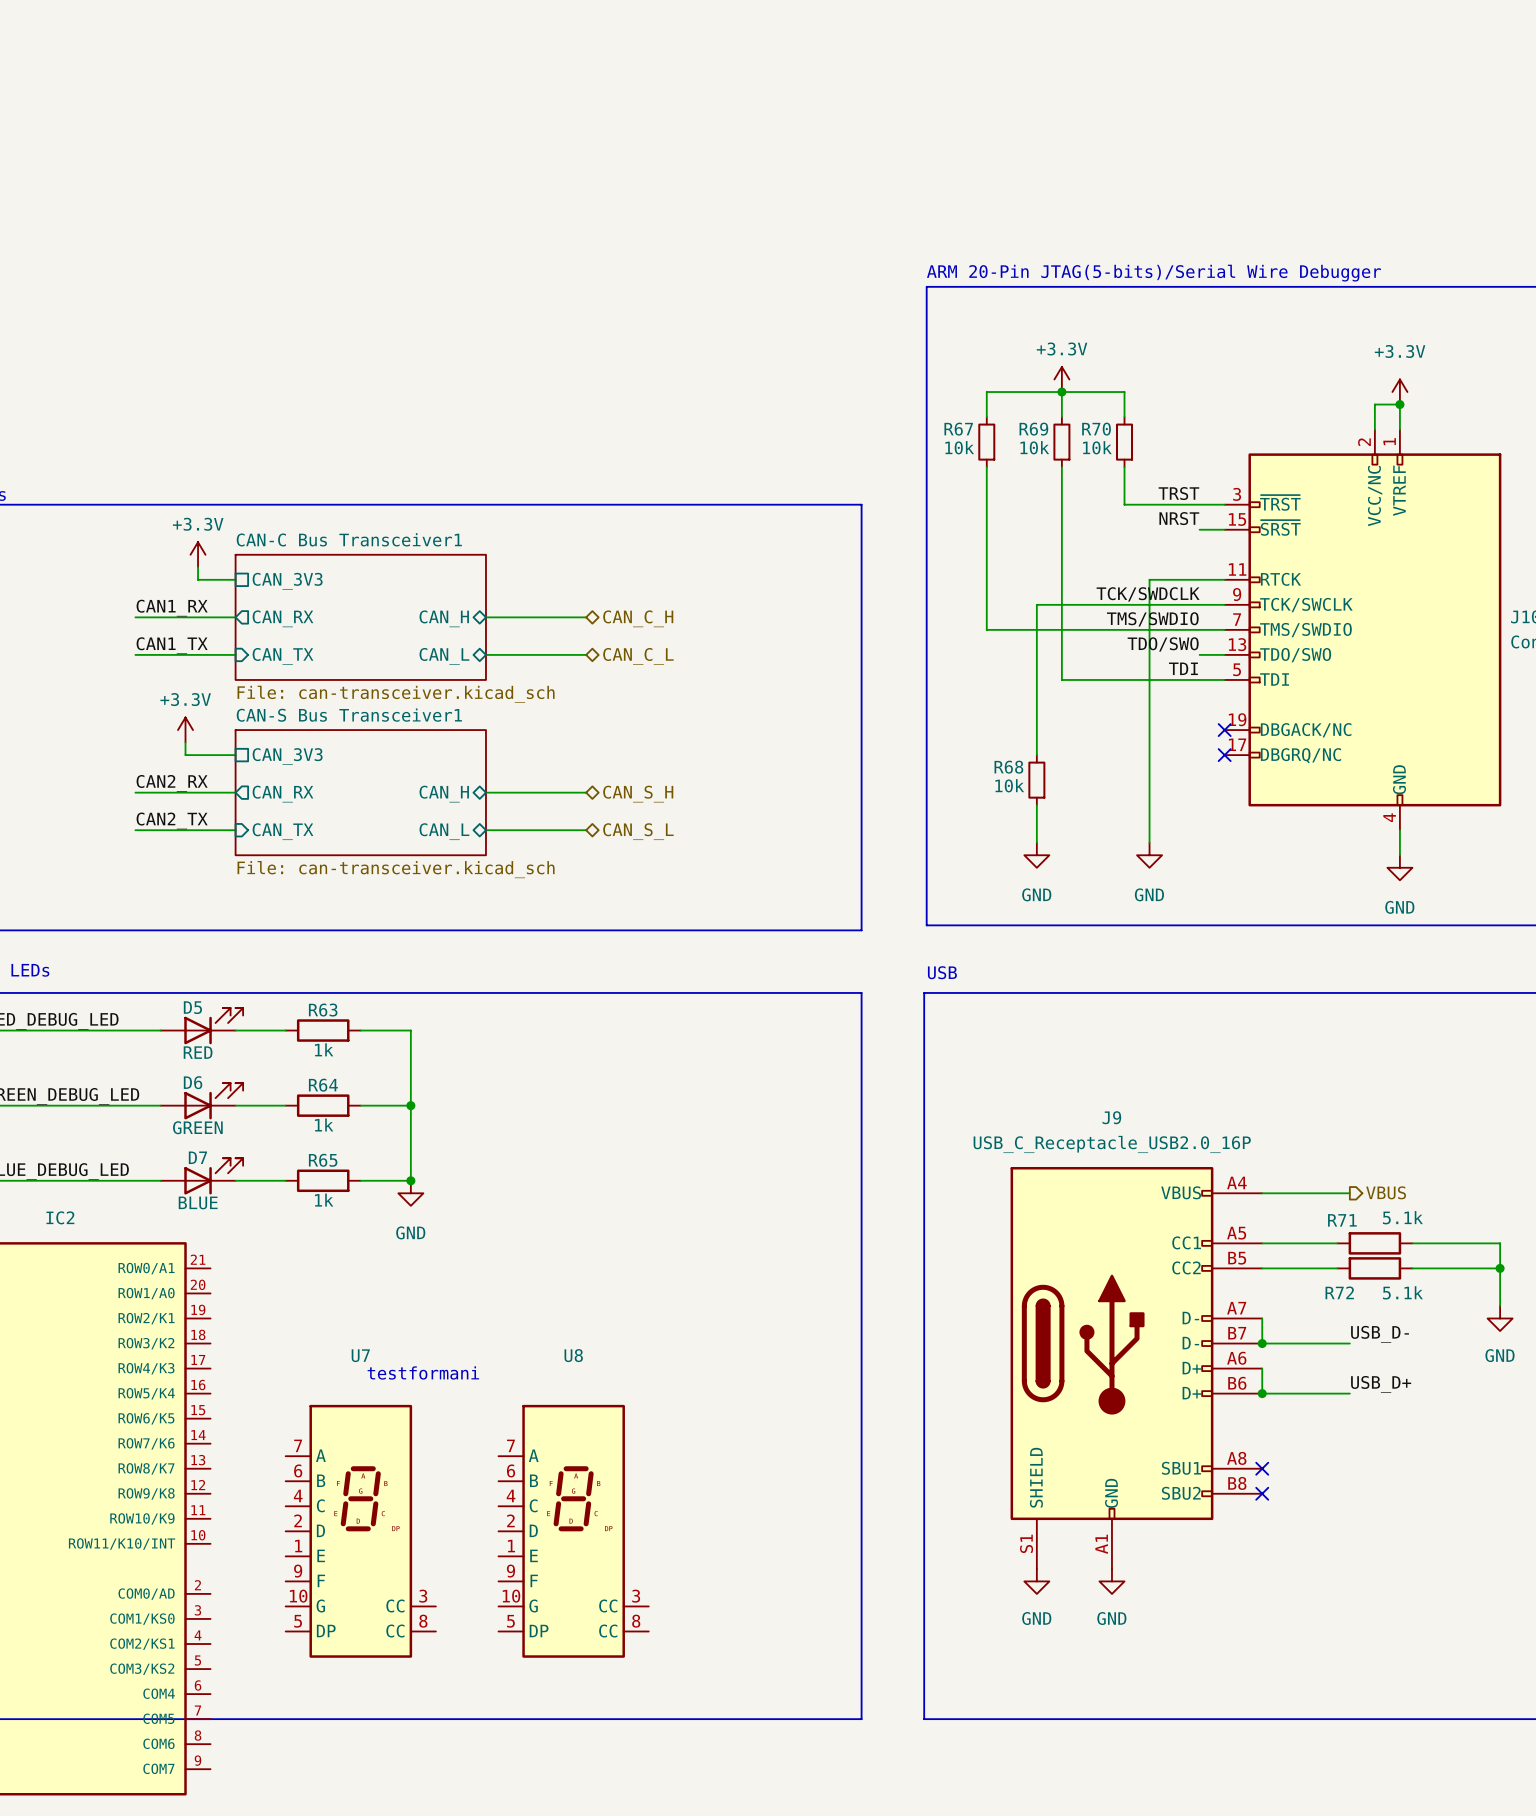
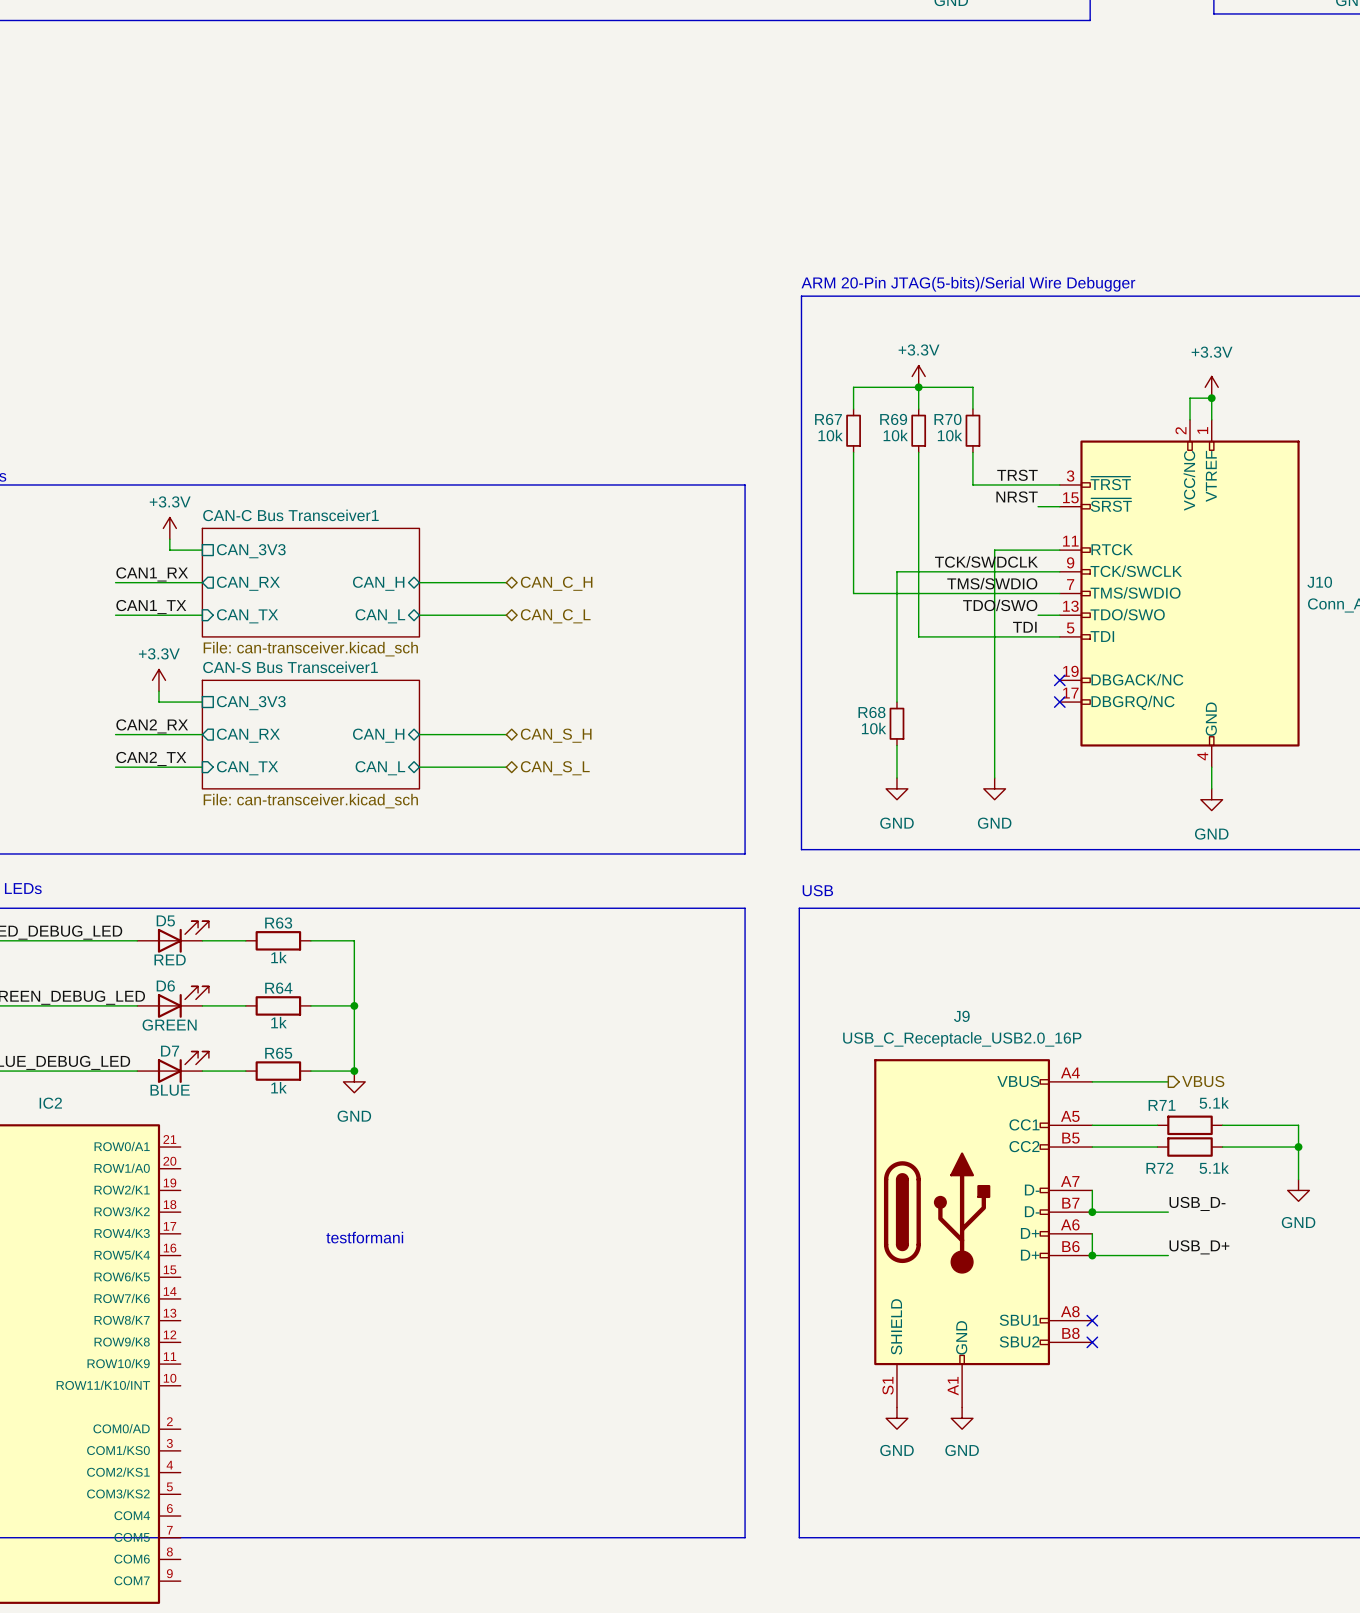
U7: (360, 1531) -> none
U8: (573, 1531) -> none

